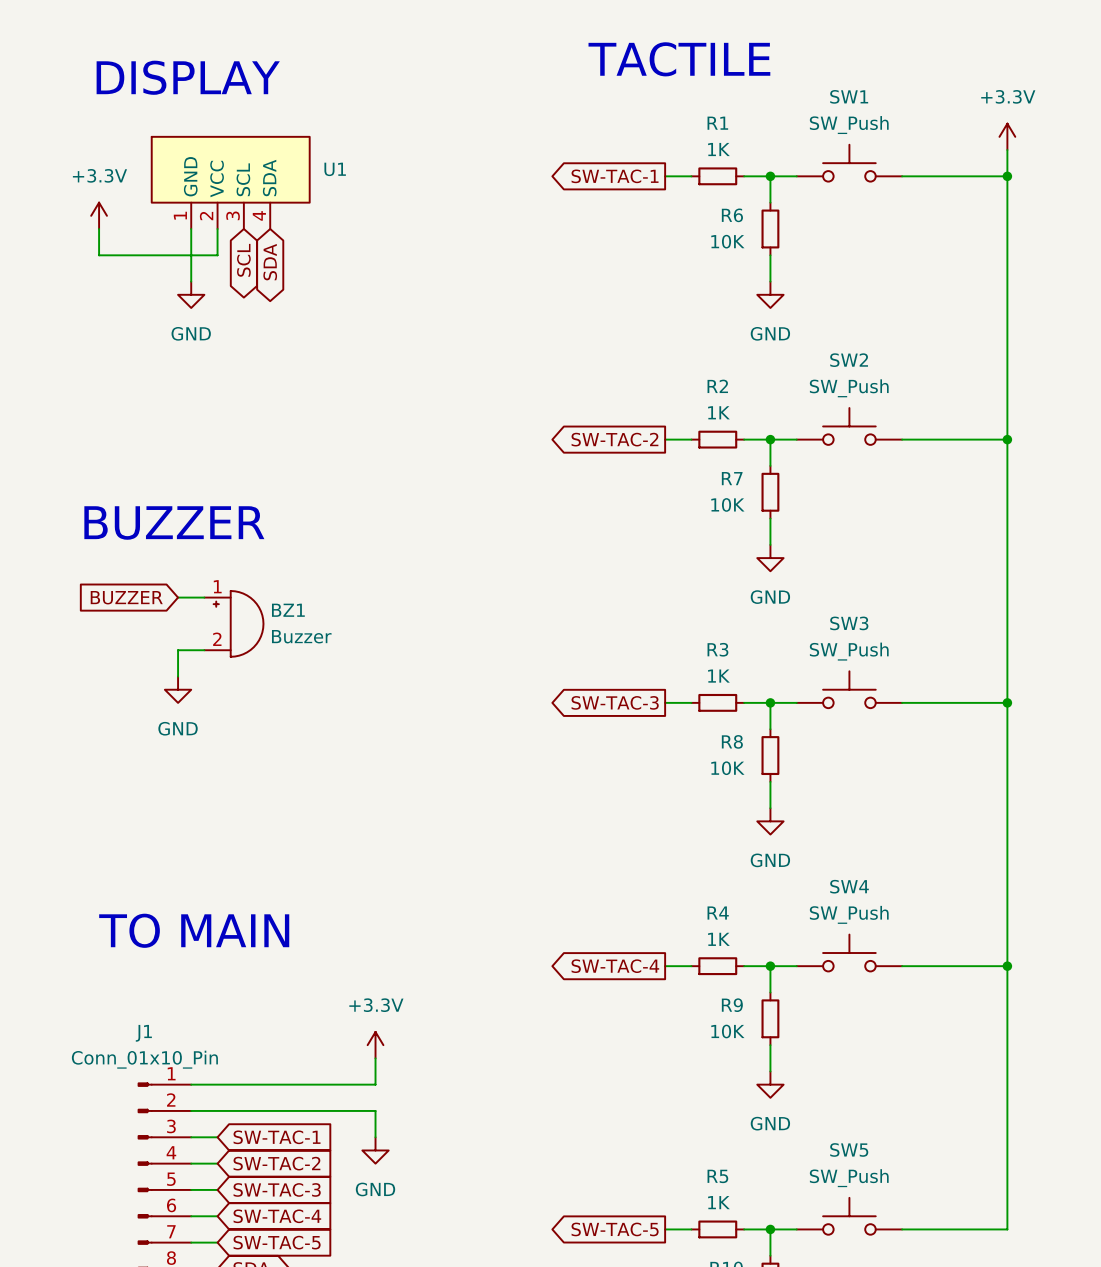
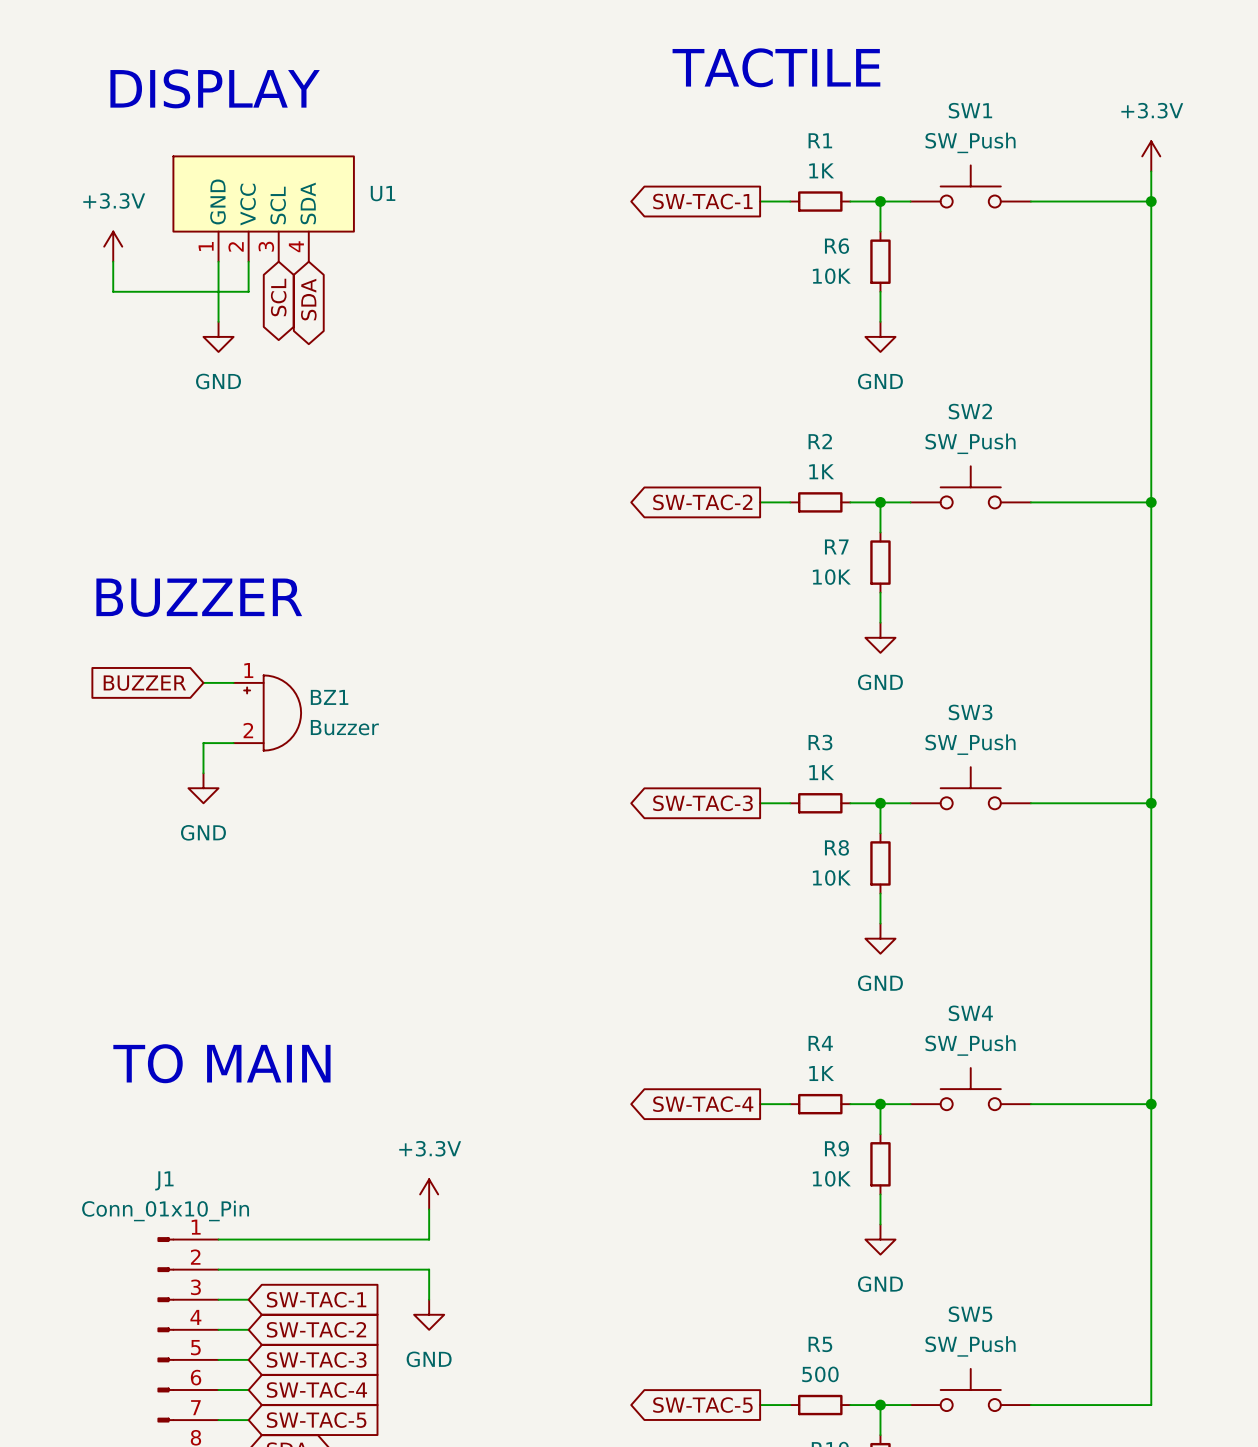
R5 value: 1K (718, 1202) -> 500 (820, 1374)

